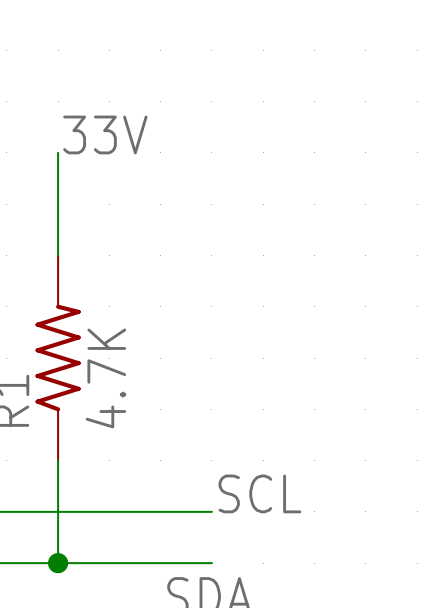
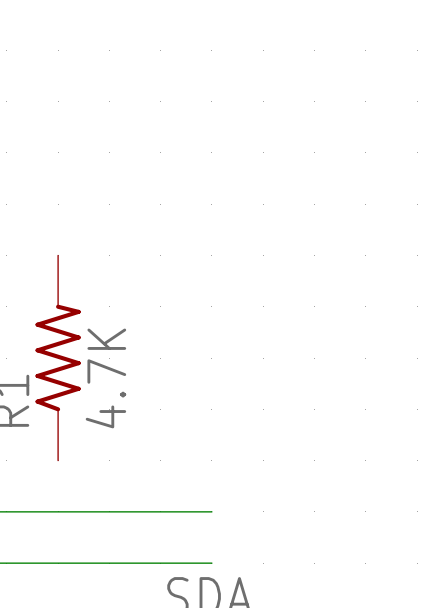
label: 33V (105, 134) -> none
wire: (58, 152) (58, 255) -> none
wire: (58, 460) (58, 563) -> none
label: SCL (259, 493) -> none
junction: (58, 563) -> none

